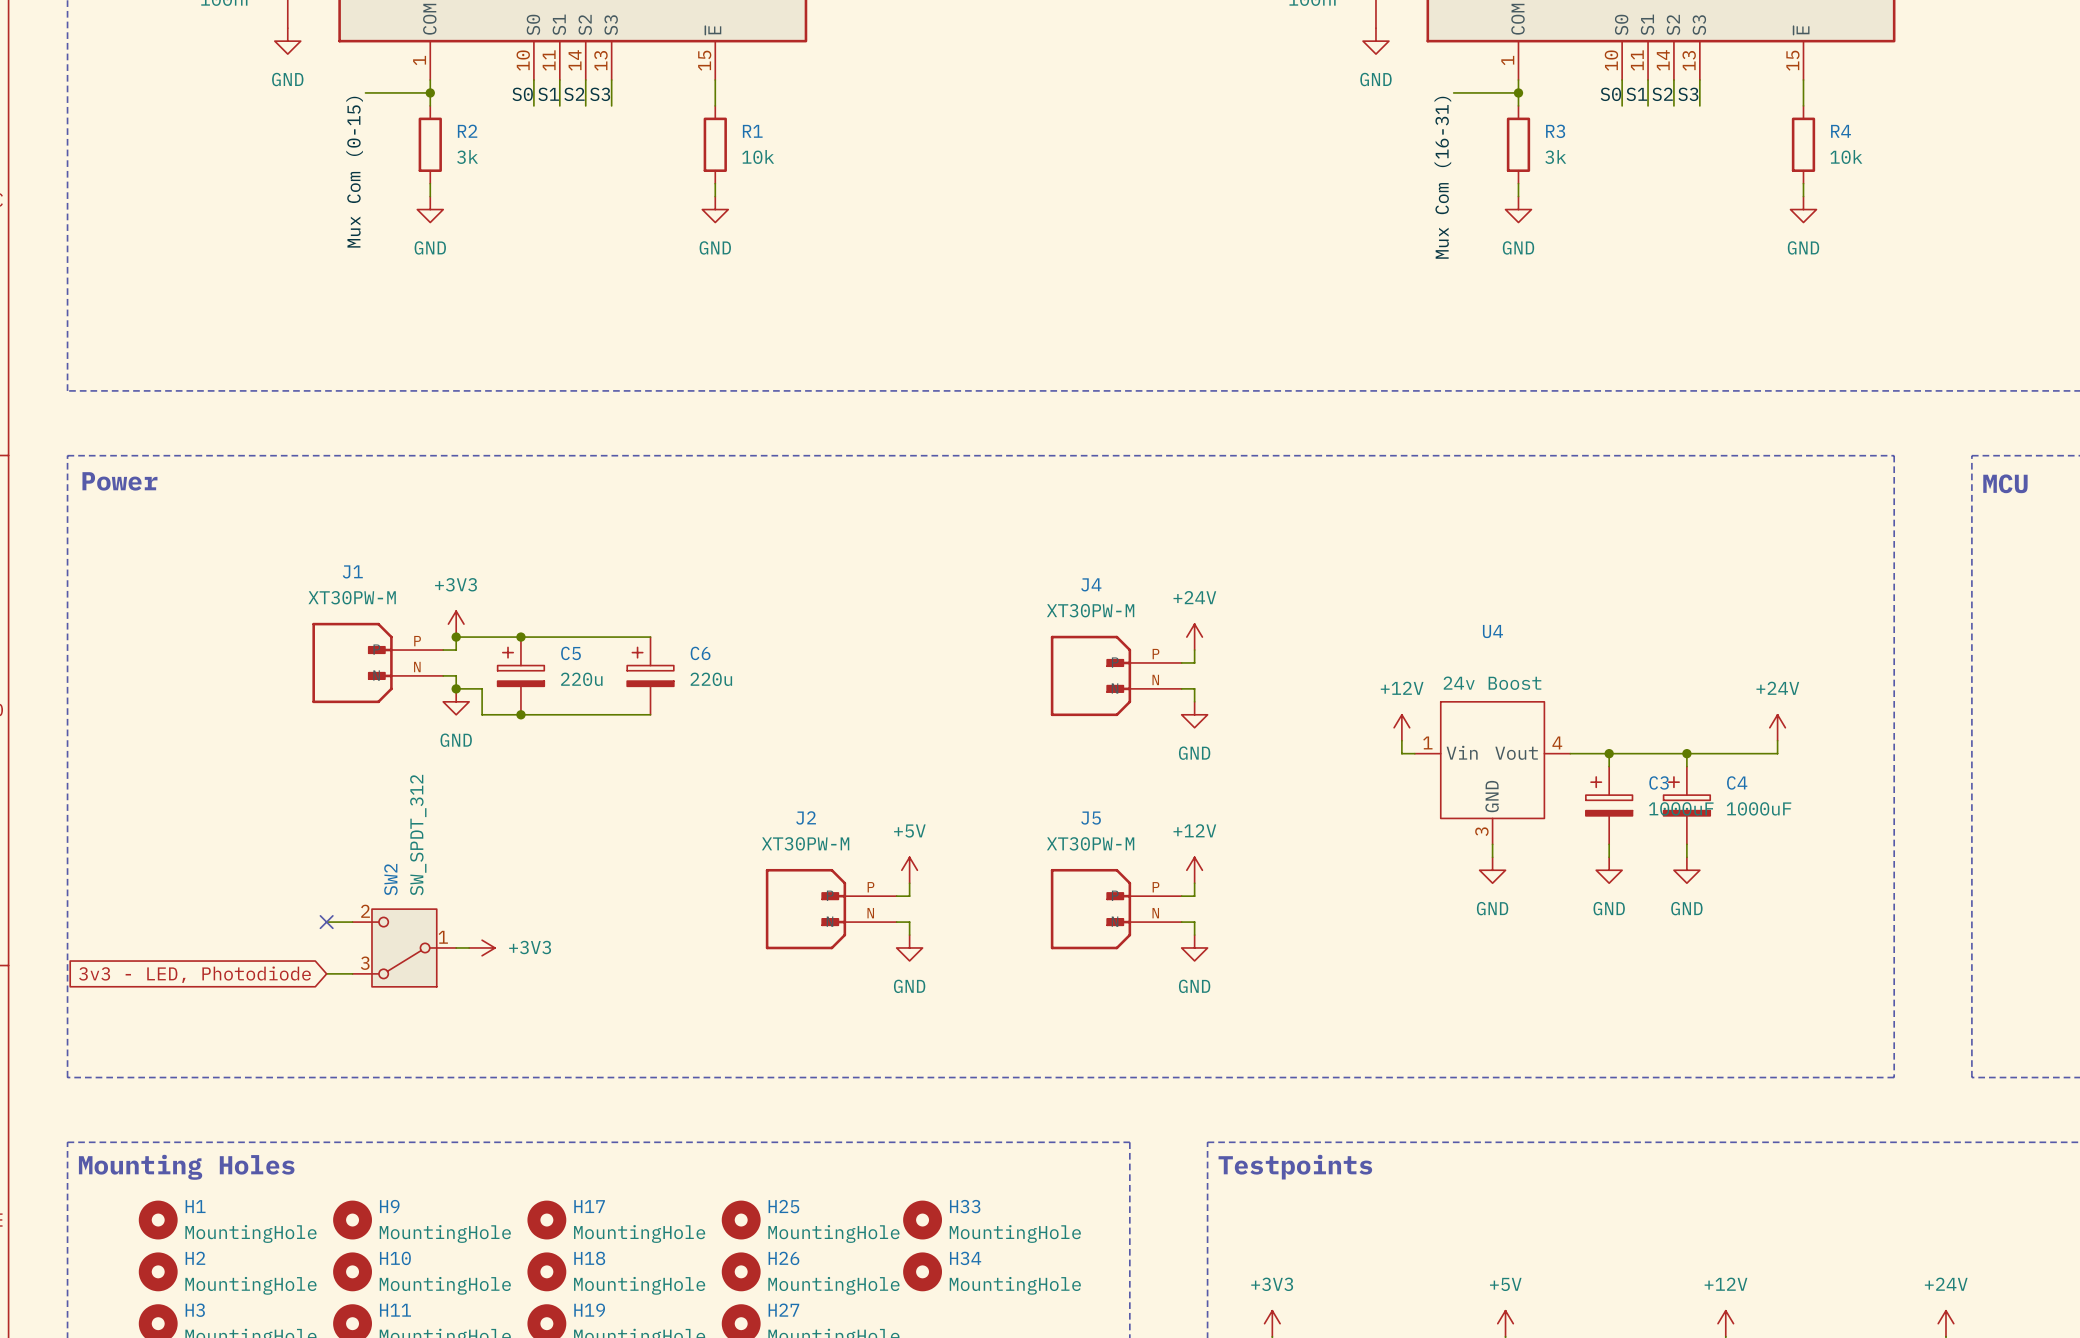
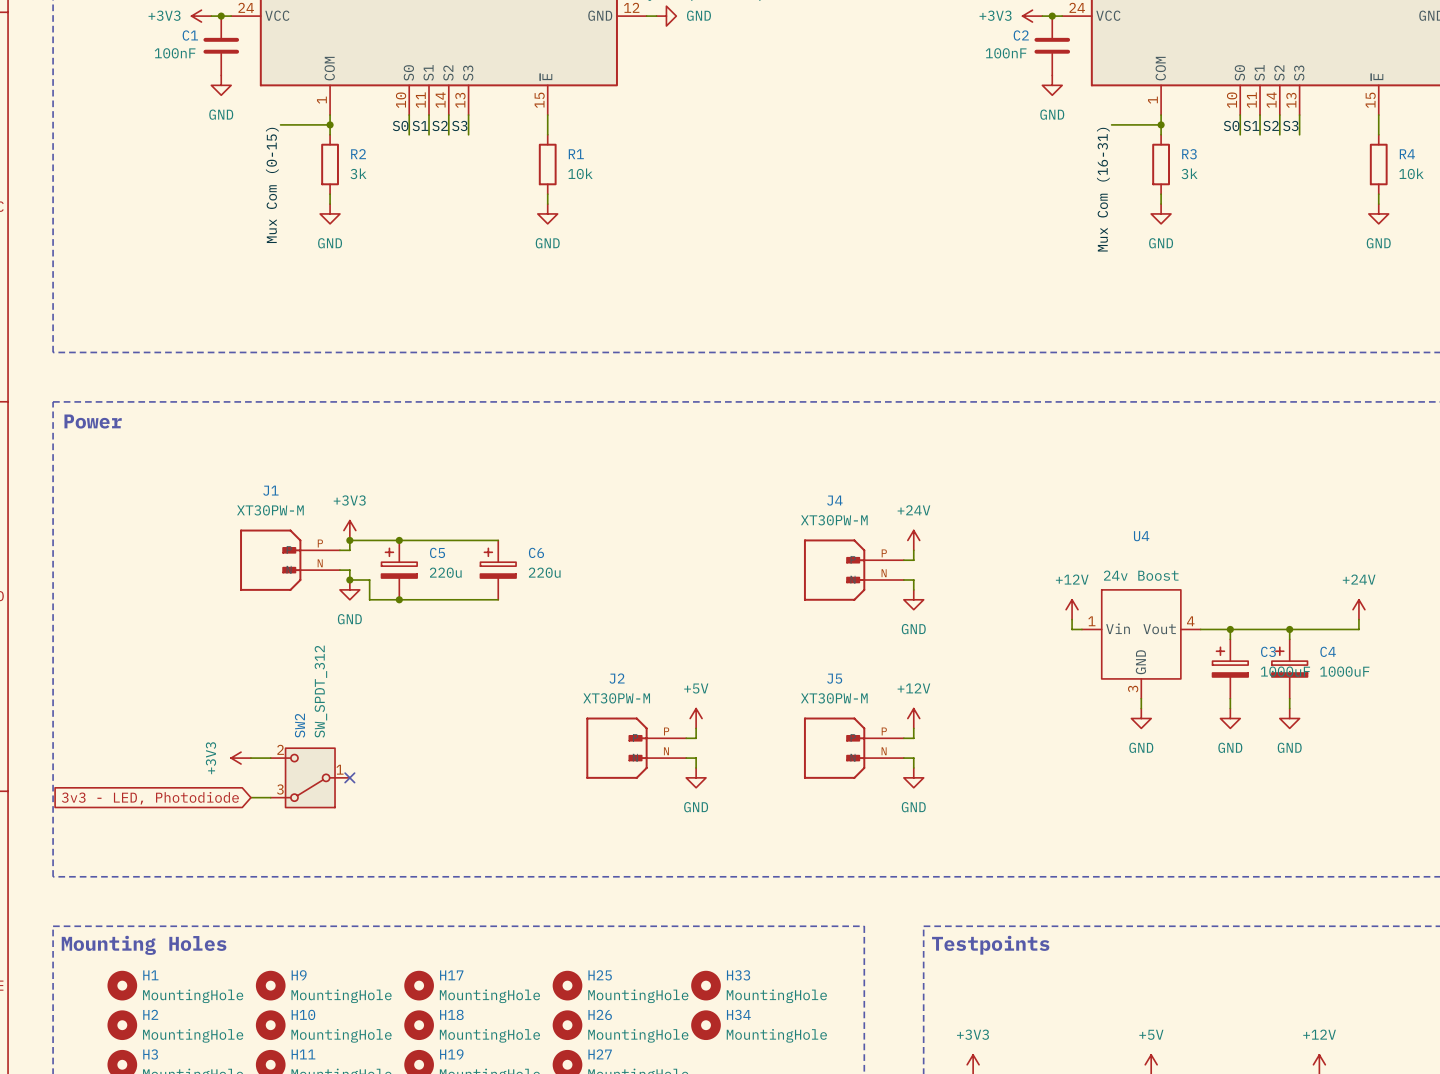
no-connect mark: (326, 922) -> none
wire: (456, 947) (469, 947) -> none
no-connect mark: none -> (349, 777)
power symbol rotation: 0° (482, 947) -> 180° (241, 758)
power symbol position: +3V3 (482, 947) -> +3V3 (241, 758)

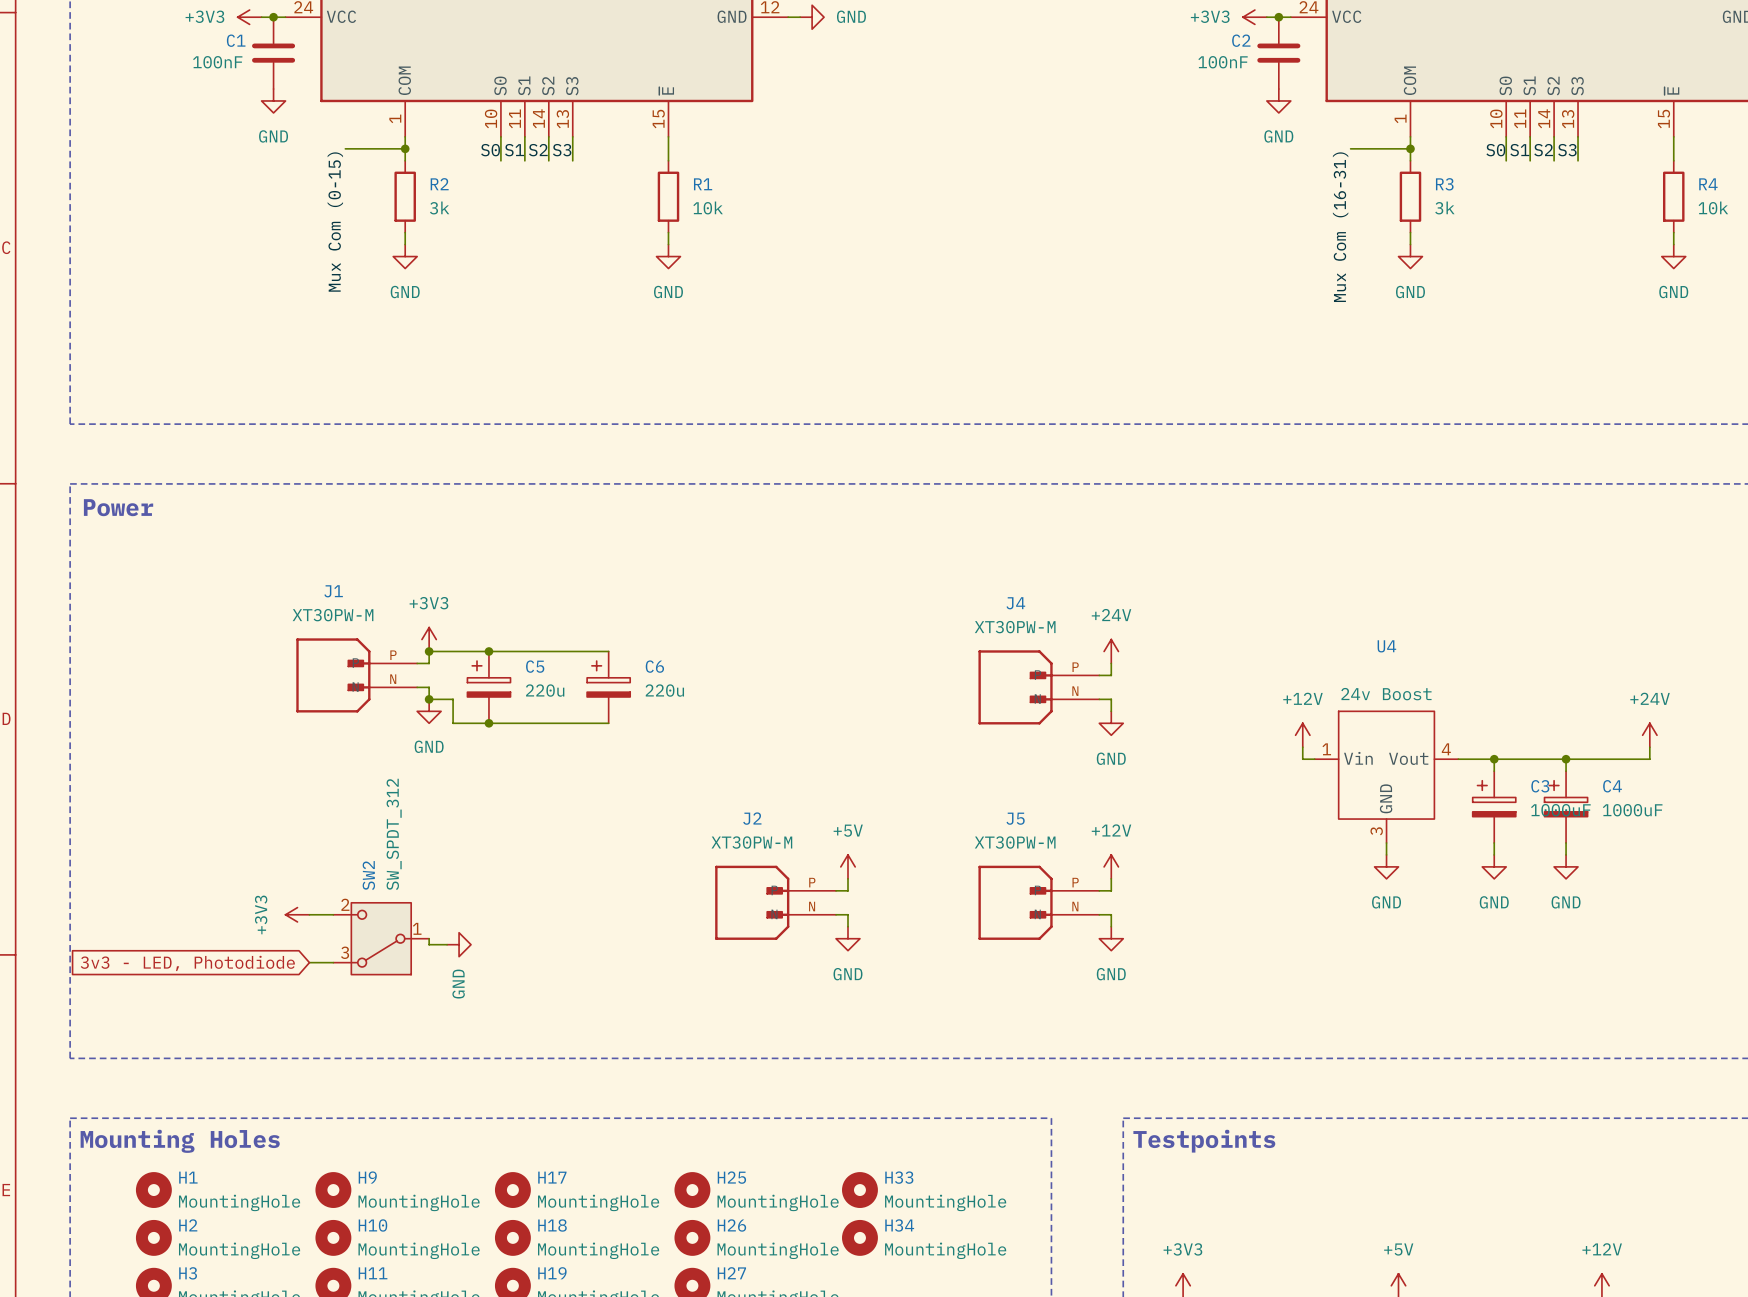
wire: none -> (429, 938) (429, 944) (447, 944)
no-connect mark: (349, 777) -> none
power symbol: none -> GND (459, 944)

